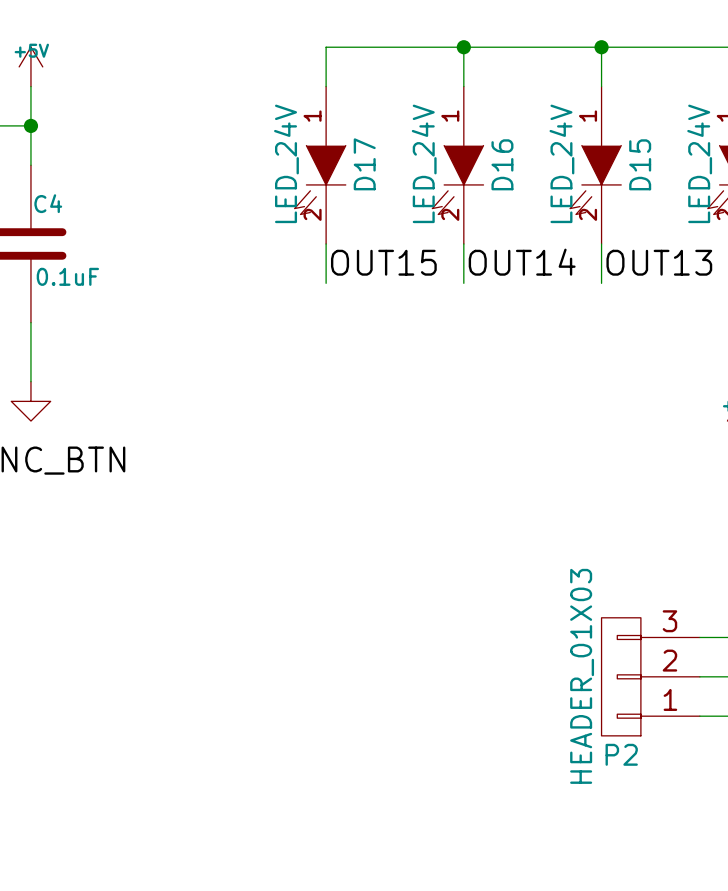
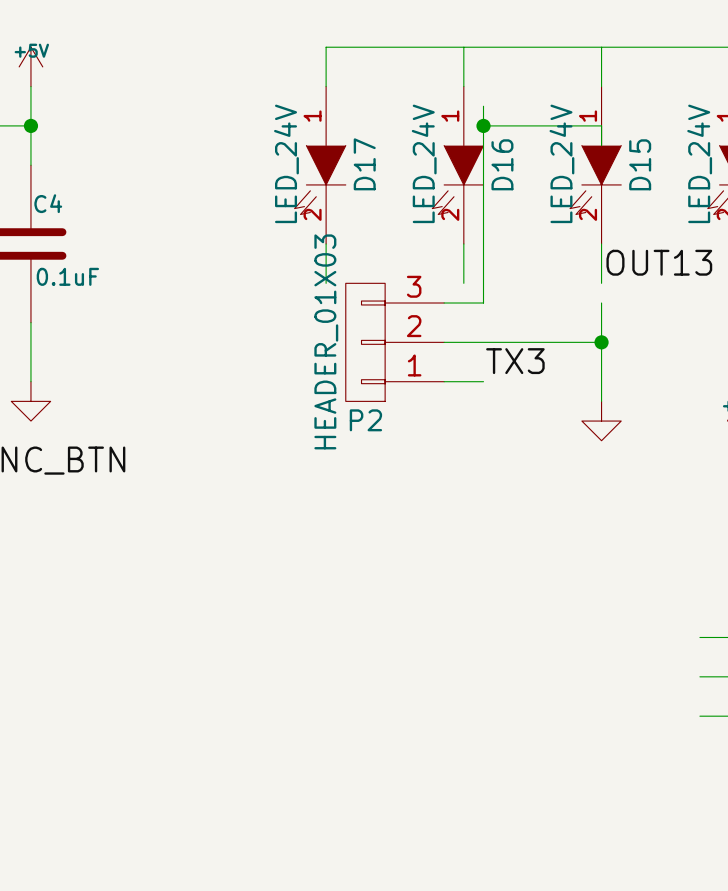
junction: (463, 47) -> none
junction: (601, 47) -> none
wire: none -> (483, 106) (483, 303) (444, 303)
wire: none -> (483, 125) (601, 125) (601, 145)
junction: none -> (483, 125)
label: OUT15 (383, 262) -> none
label: OUT14 (522, 262) -> none
wire: none -> (601, 303) (601, 401)
wire: none -> (444, 342) (601, 342)
junction: none -> (601, 342)
label: none -> TX3 (515, 361)
wire: none -> (444, 381) (483, 381)
power symbol: none -> (601, 421)
P2 position: (650, 676) -> (394, 342)

